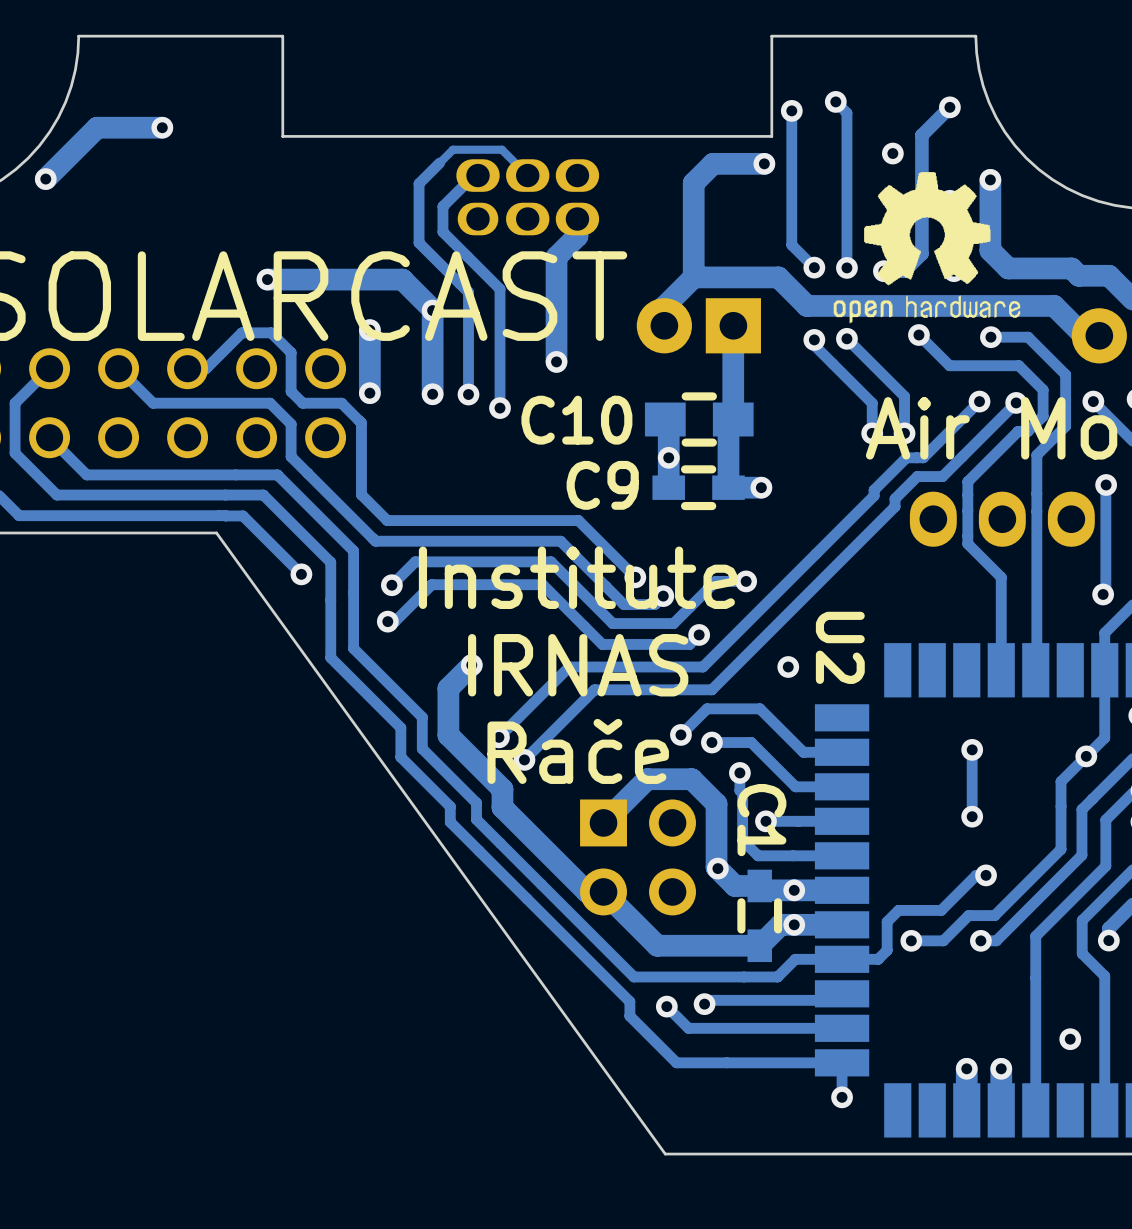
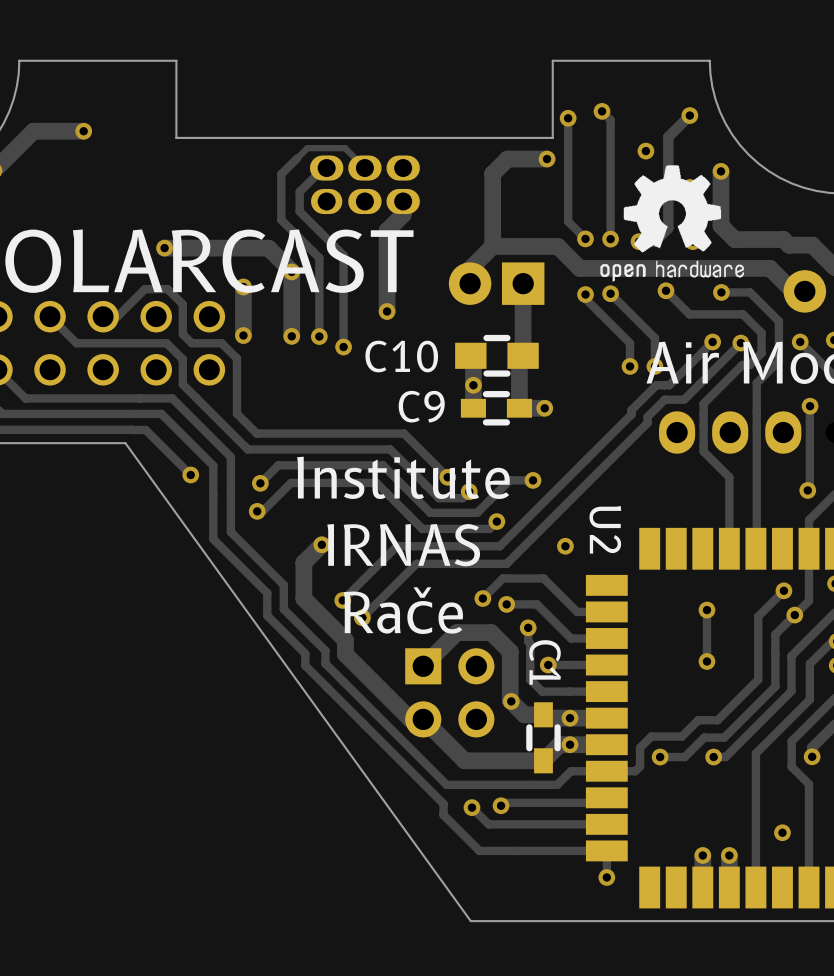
via: none -> (783, 590)
track: (986, 875) (976, 875) (941, 910) (898, 910) (887, 921) (887, 950) (878, 959) -> (783, 590) (758, 616) (758, 679) (717, 720) (698, 720) (681, 736) (651, 736) (640, 747) (640, 766) (634, 771)
via: (986, 875) -> none

